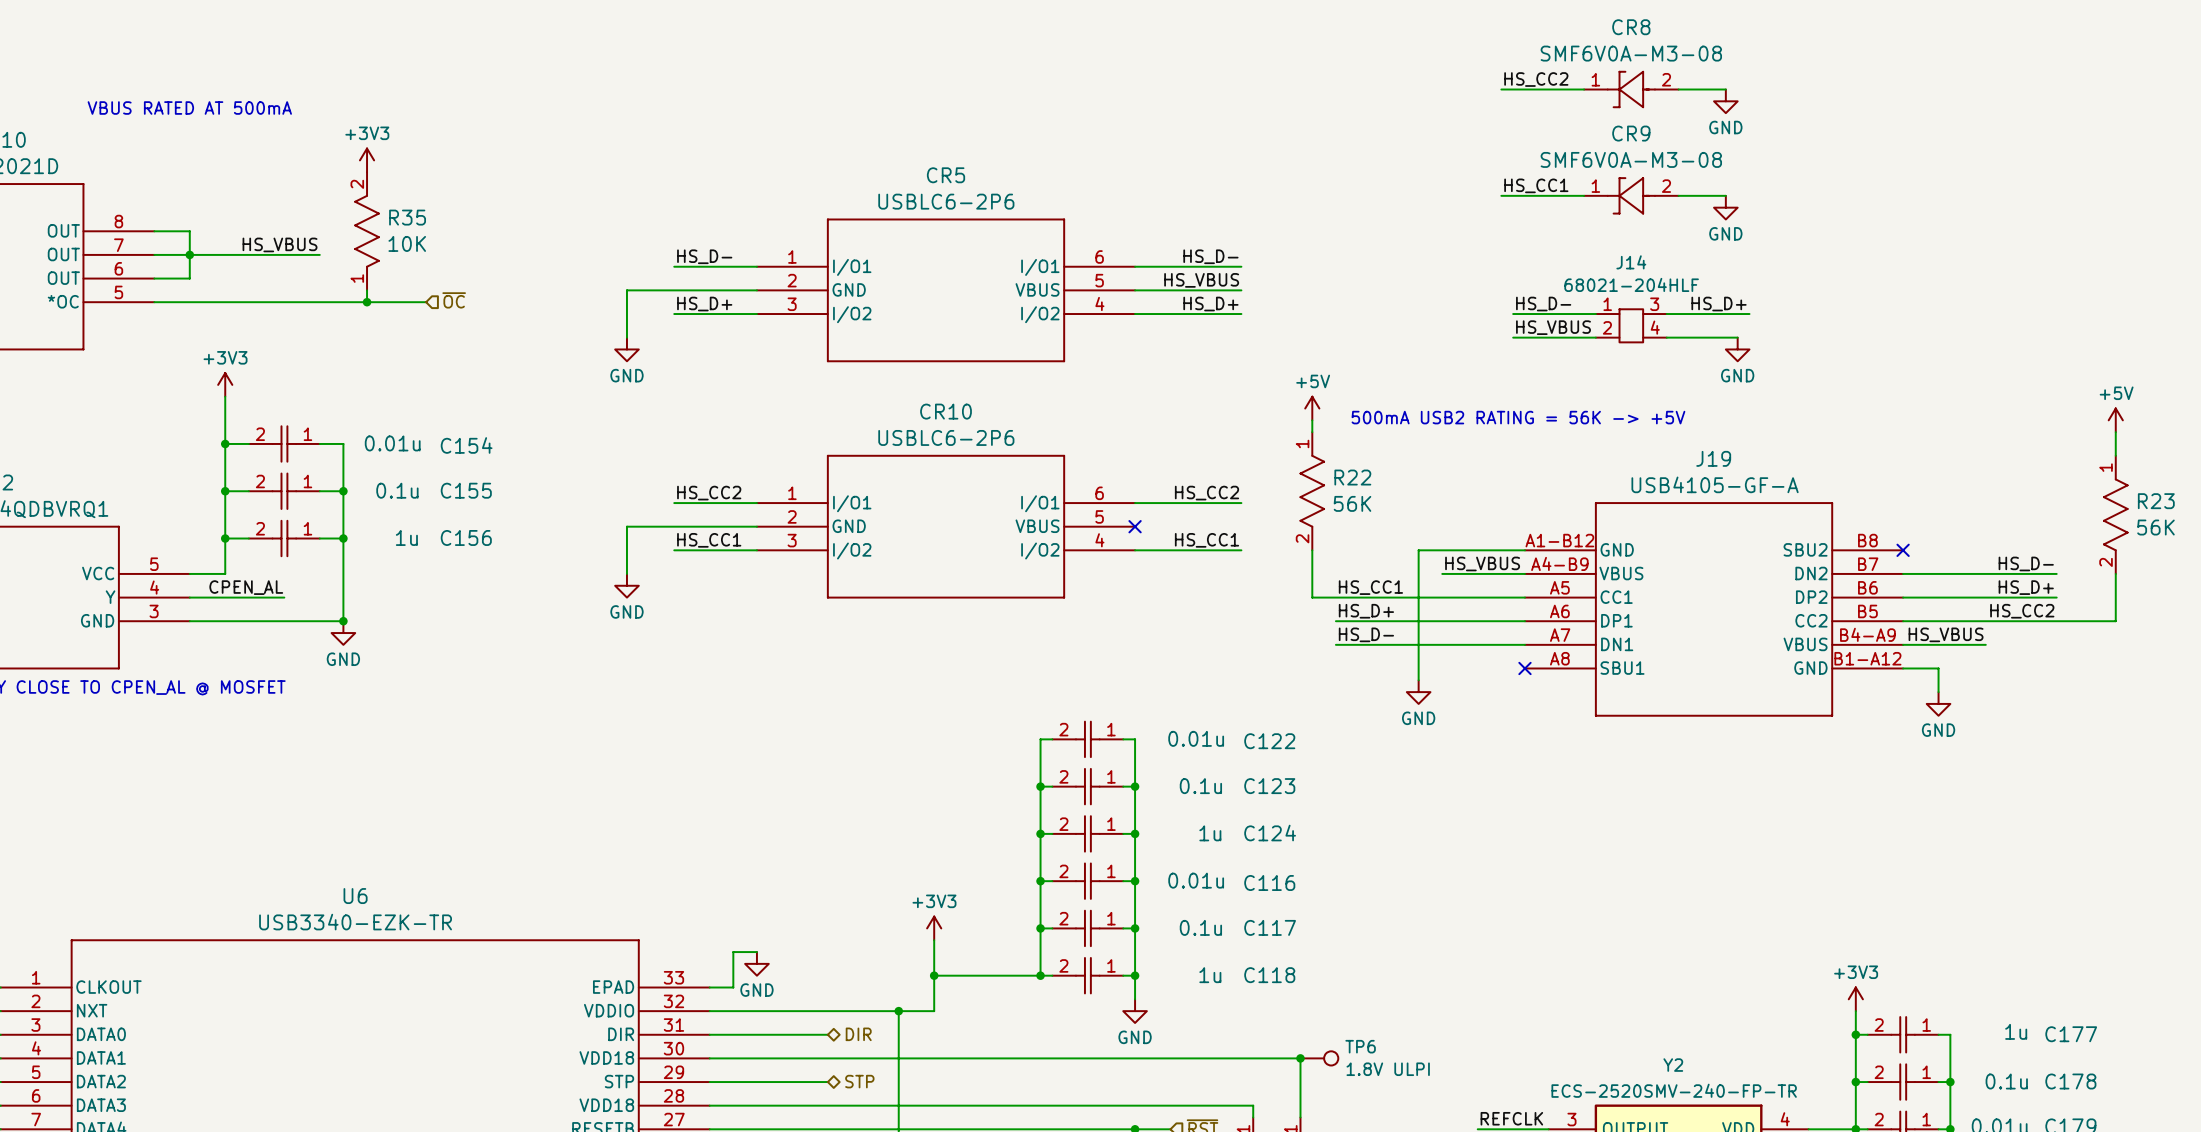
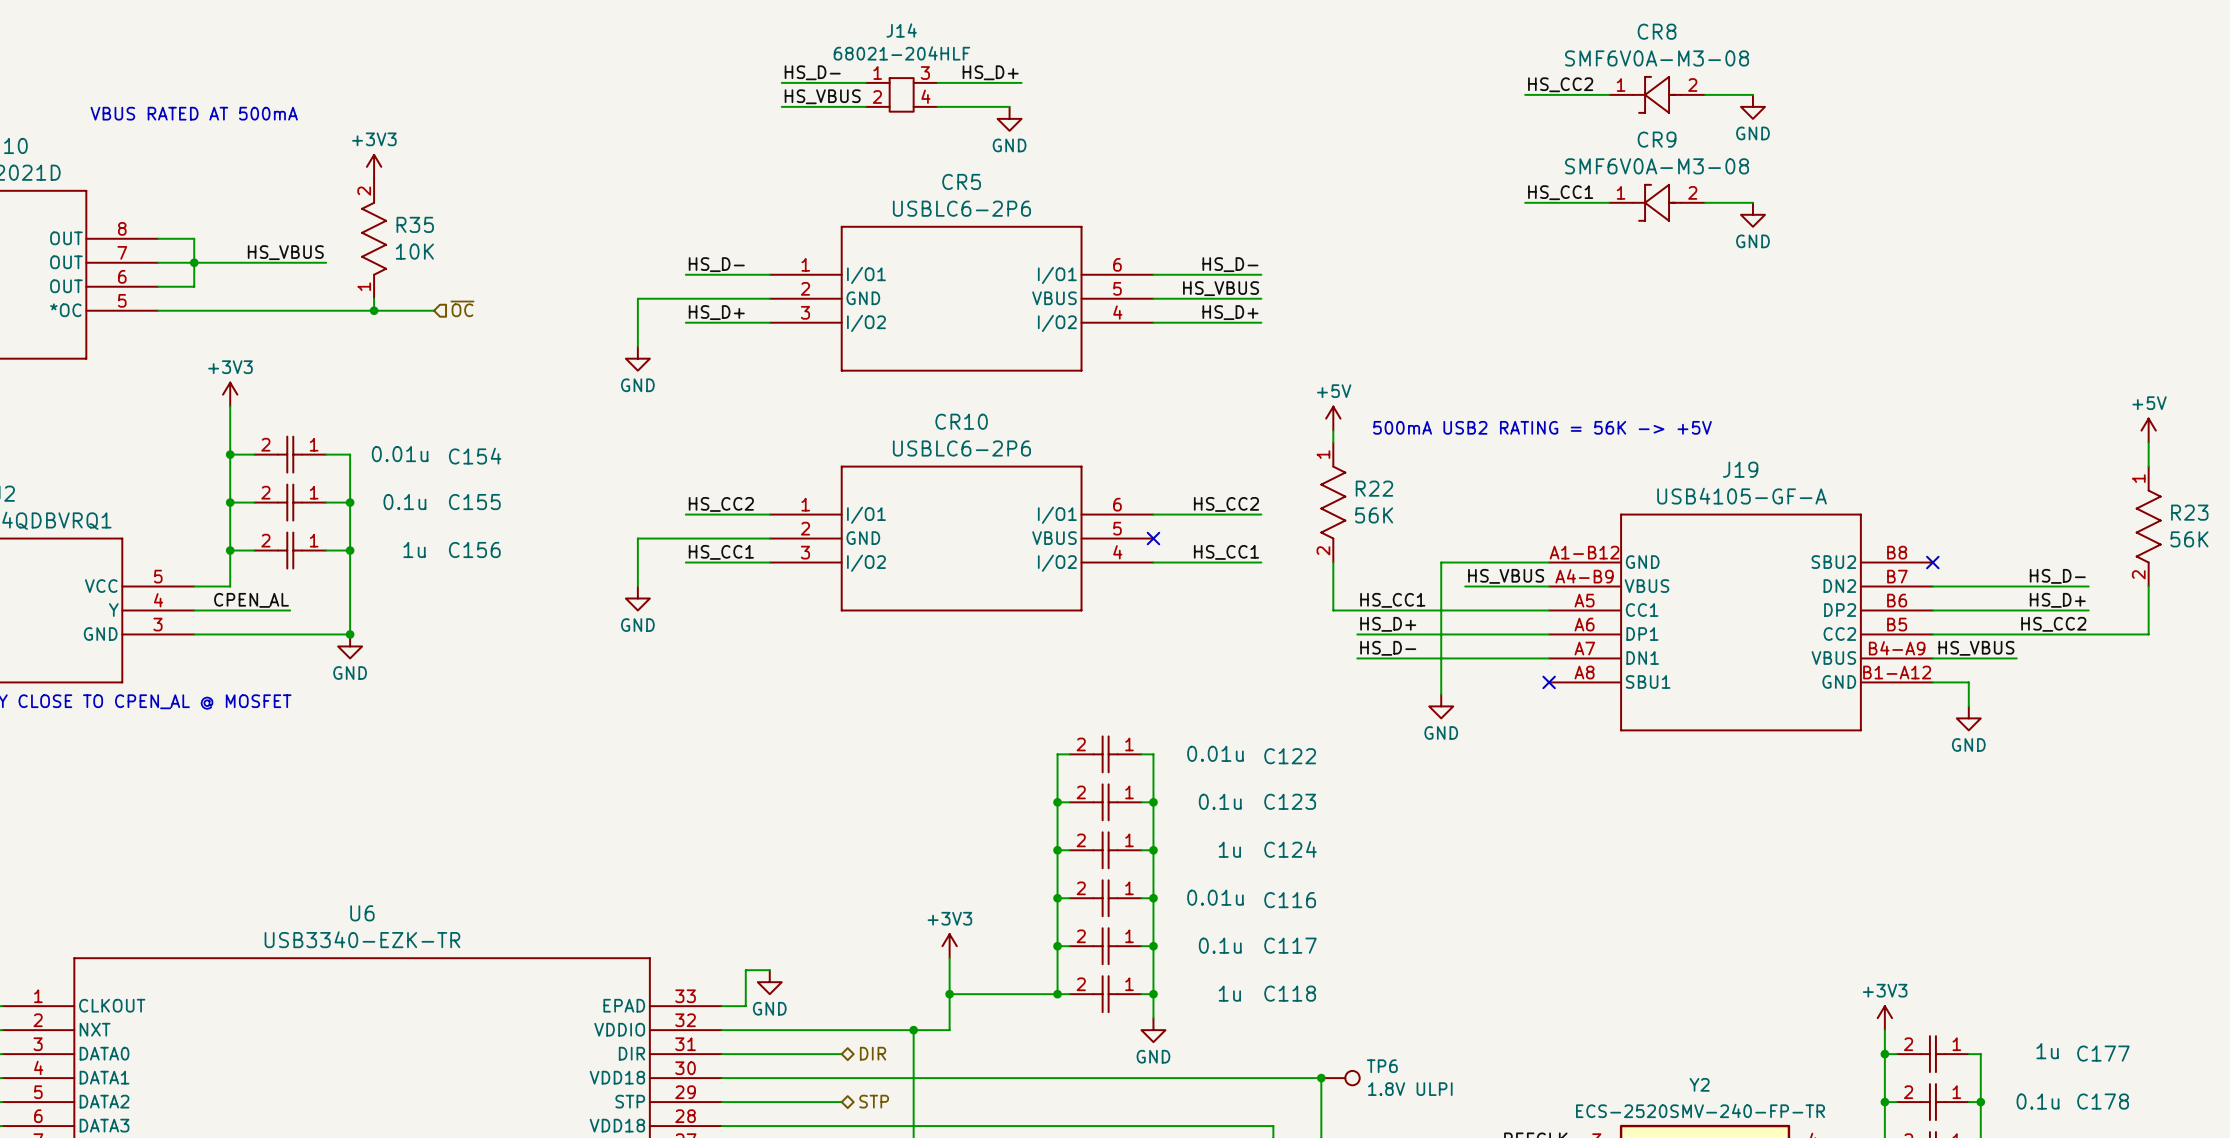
label: none -> HS_D- (812, 72)
label: none -> HS_D+ (990, 72)
wire: none -> (781, 82) (865, 82)
wire: none -> (937, 82) (1021, 82)
label: none -> HS_VBUS (822, 96)
wire: none -> (781, 106) (865, 106)
wire: none -> (937, 106) (1009, 106)
power symbol: none -> GND (1009, 118)
label: HS_D- (1543, 304) -> none
label: HS_D+ (1719, 304) -> none
wire: (1513, 314) (1595, 314) -> none
wire: (1666, 314) (1749, 314) -> none
J14 position: (1631, 325) -> (901, 94)
label: HS_VBUS (1553, 327) -> none
wire: (1513, 337) (1595, 337) -> none
wire: (1666, 337) (1737, 337) -> none
power symbol: GND (1737, 349) -> none

